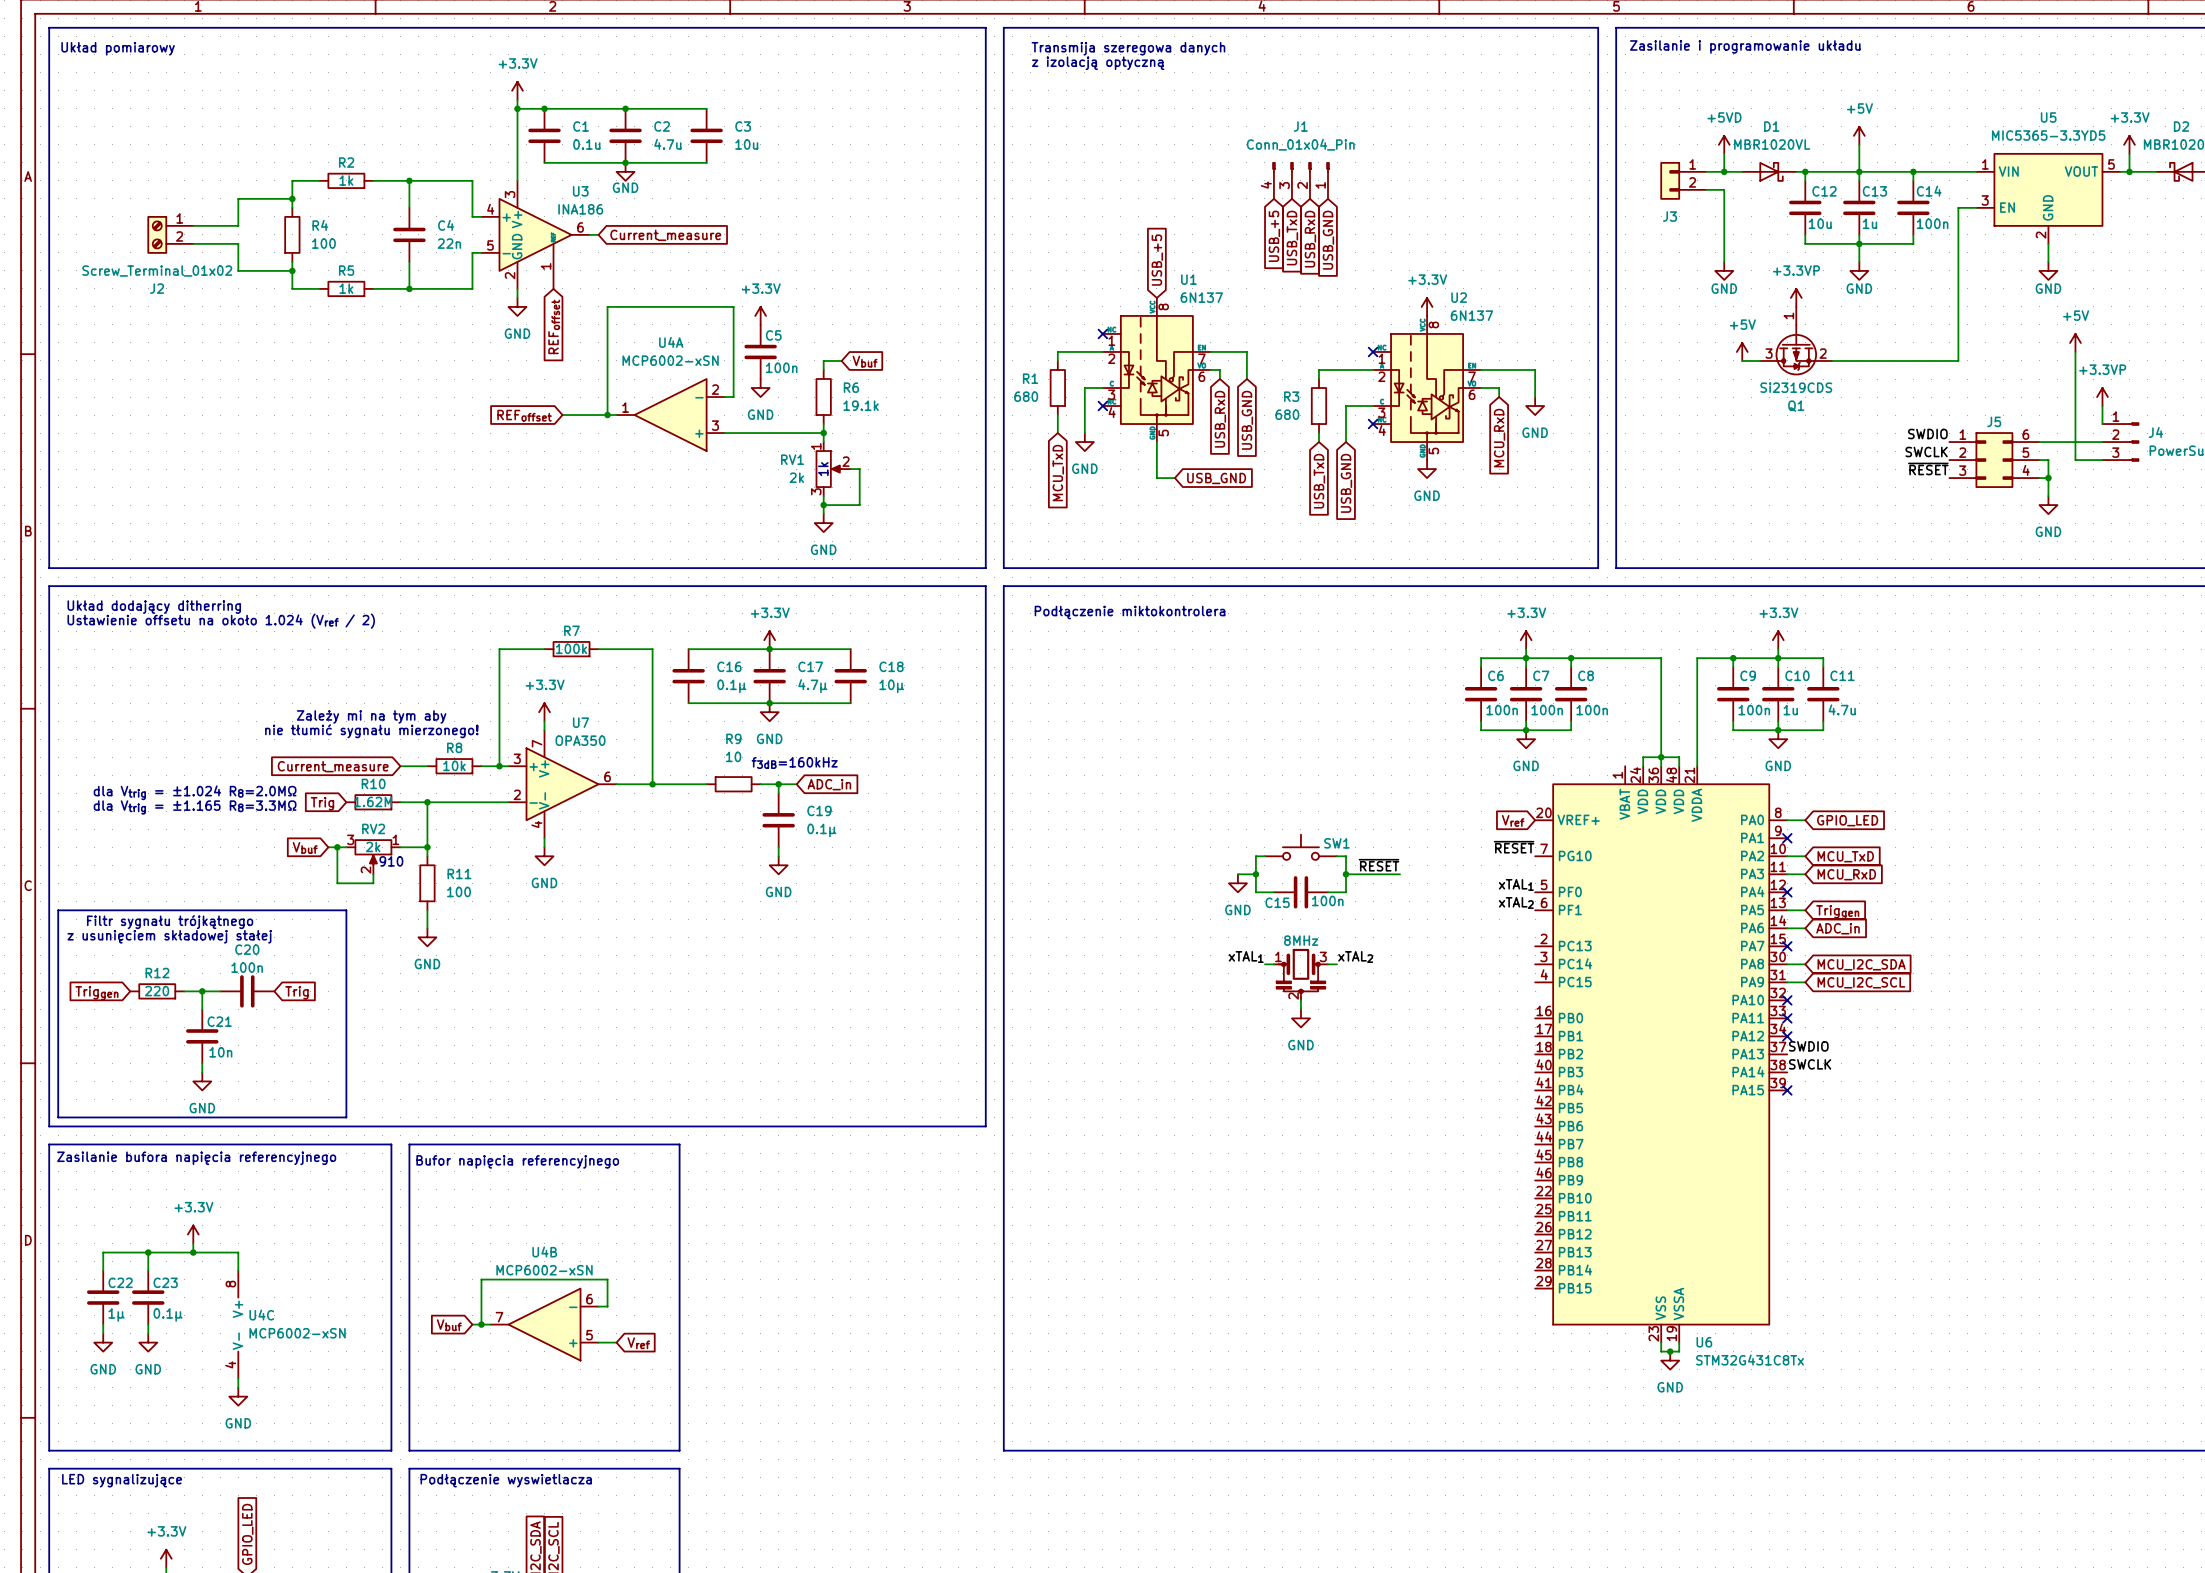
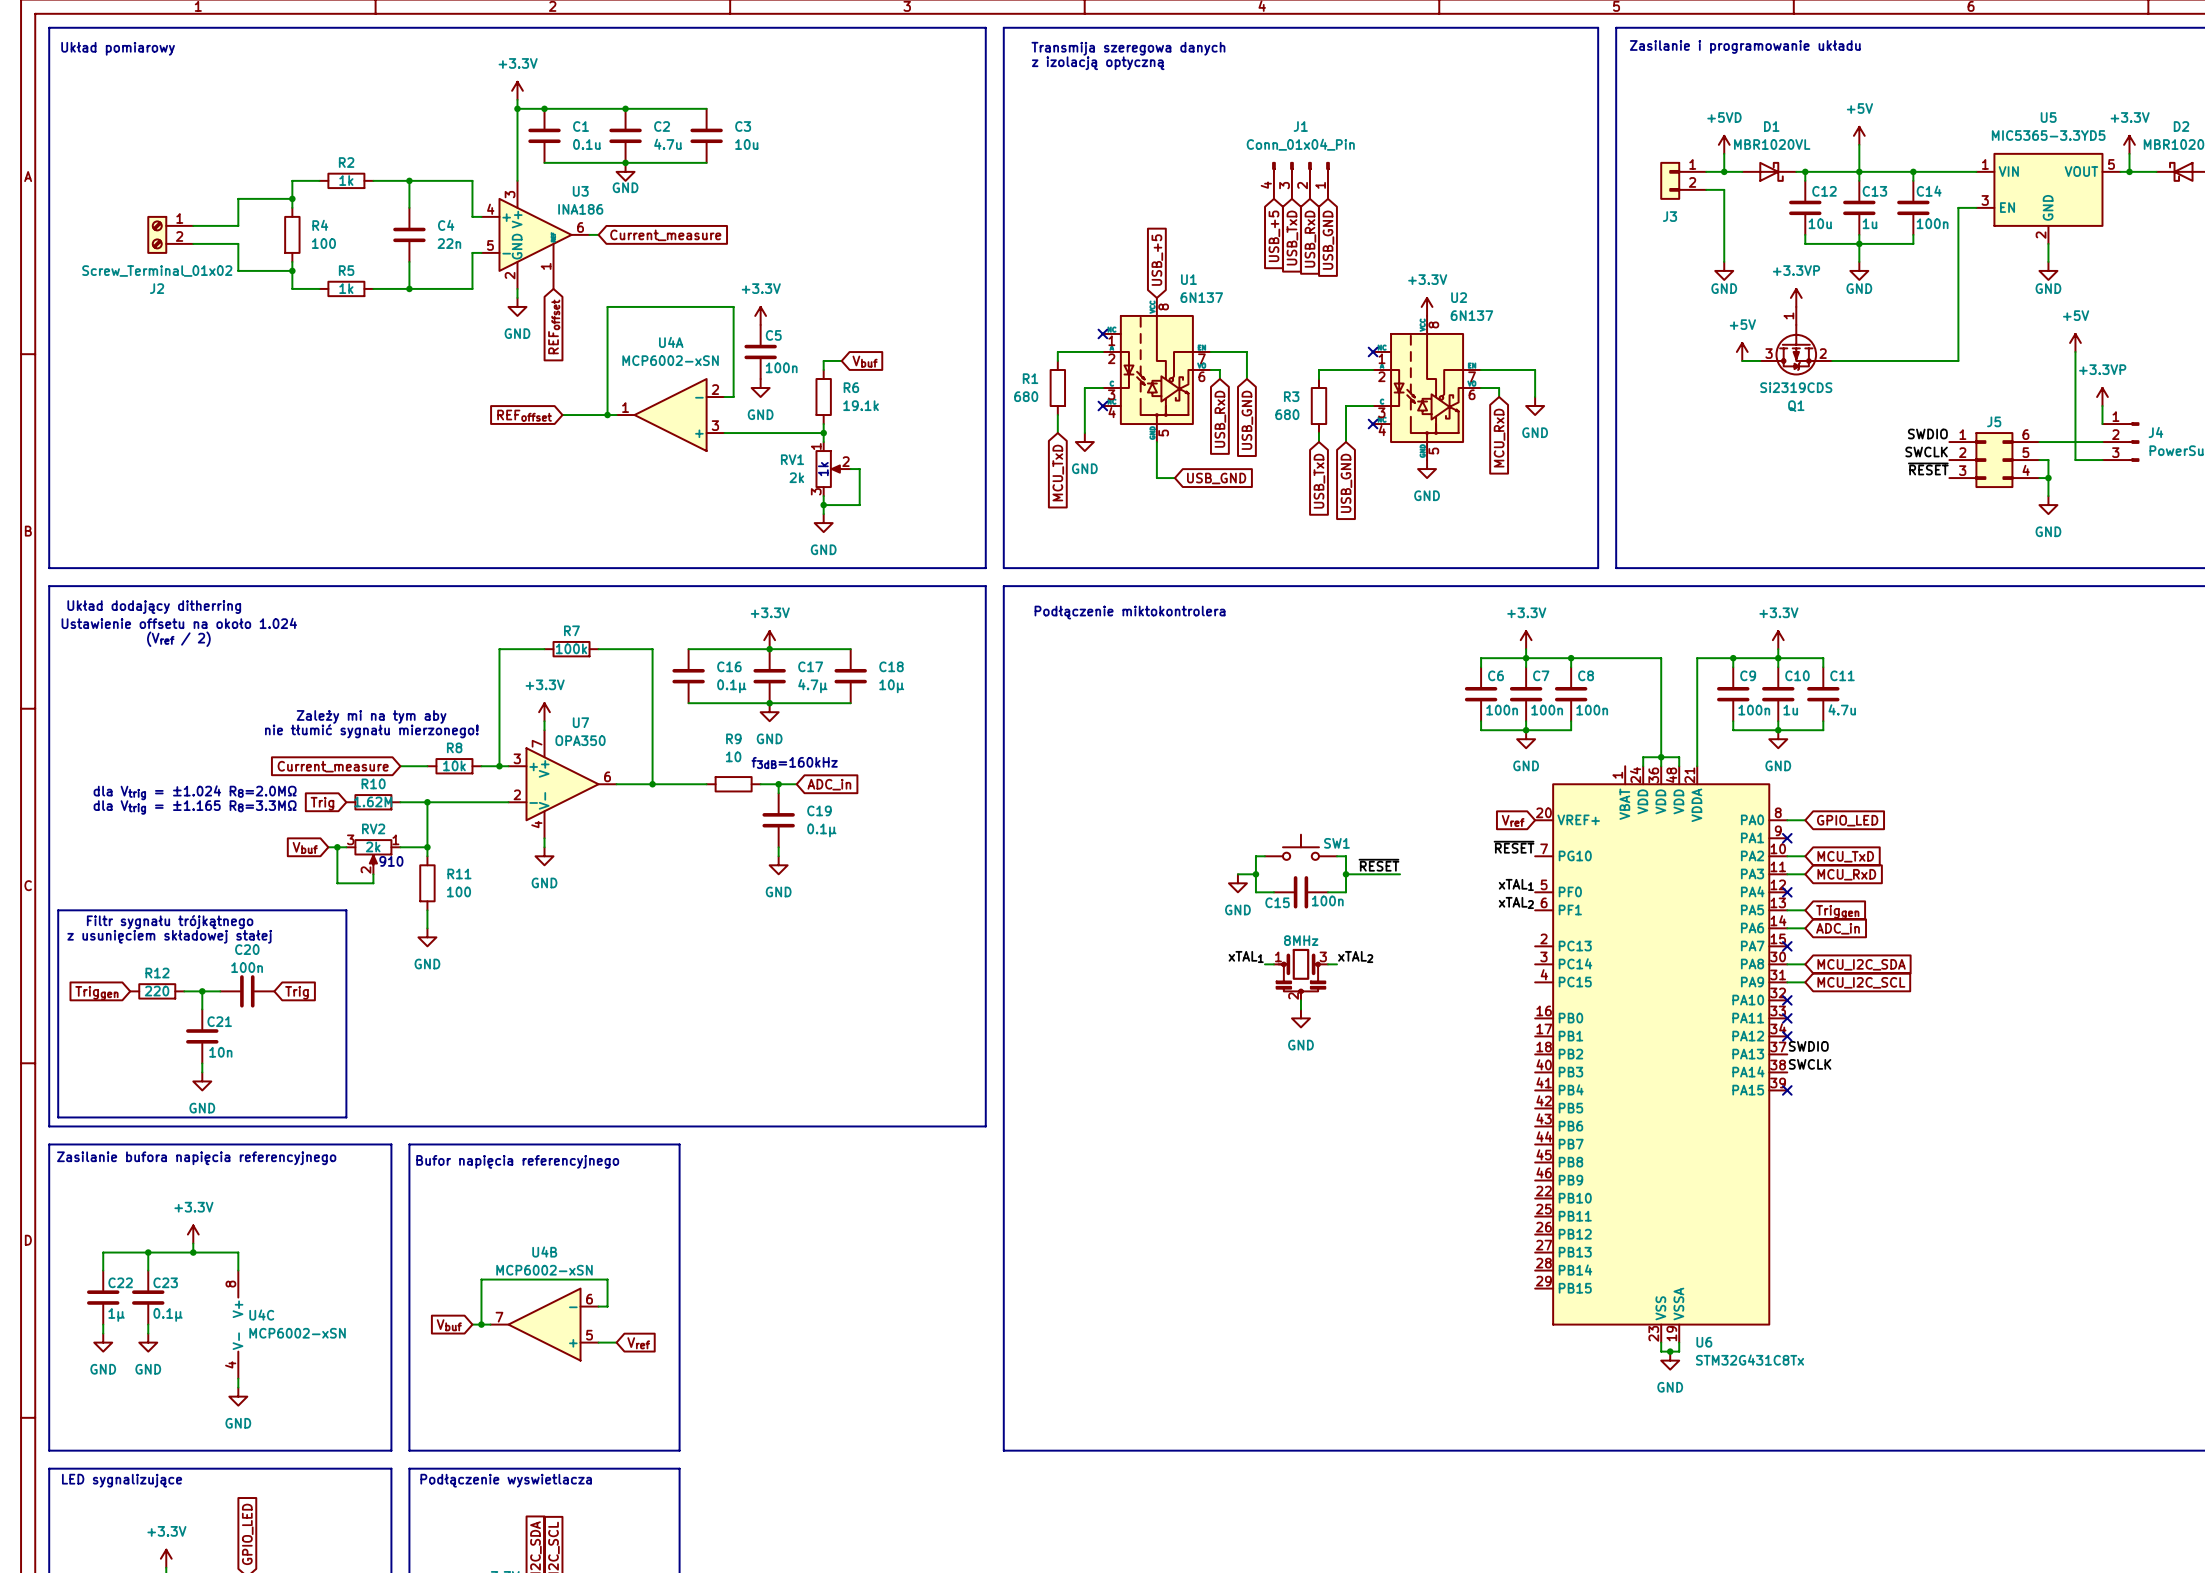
text: Ustawienie offsetu na około 1.024 (Vref / 2) (221, 621) -> Ustawienie offsetu na około 1.024 (179, 623)
text: none -> (Vref / 2) (178, 639)

